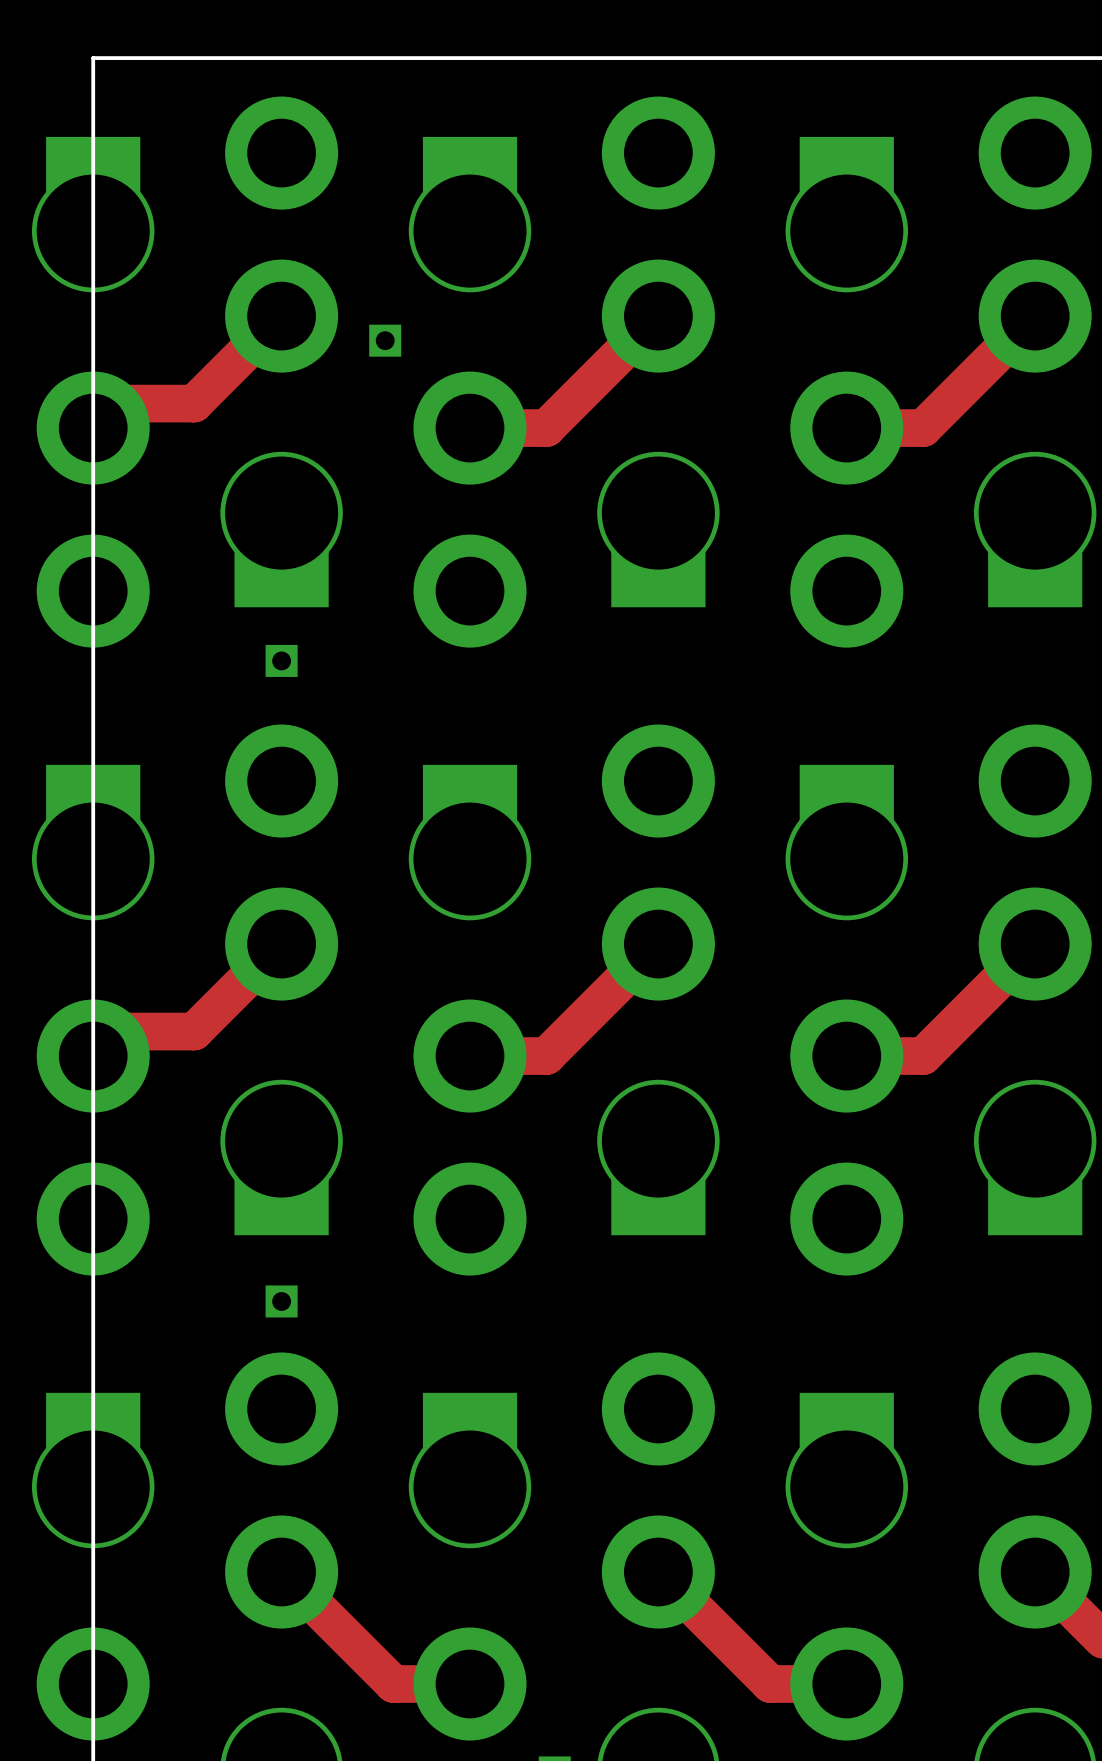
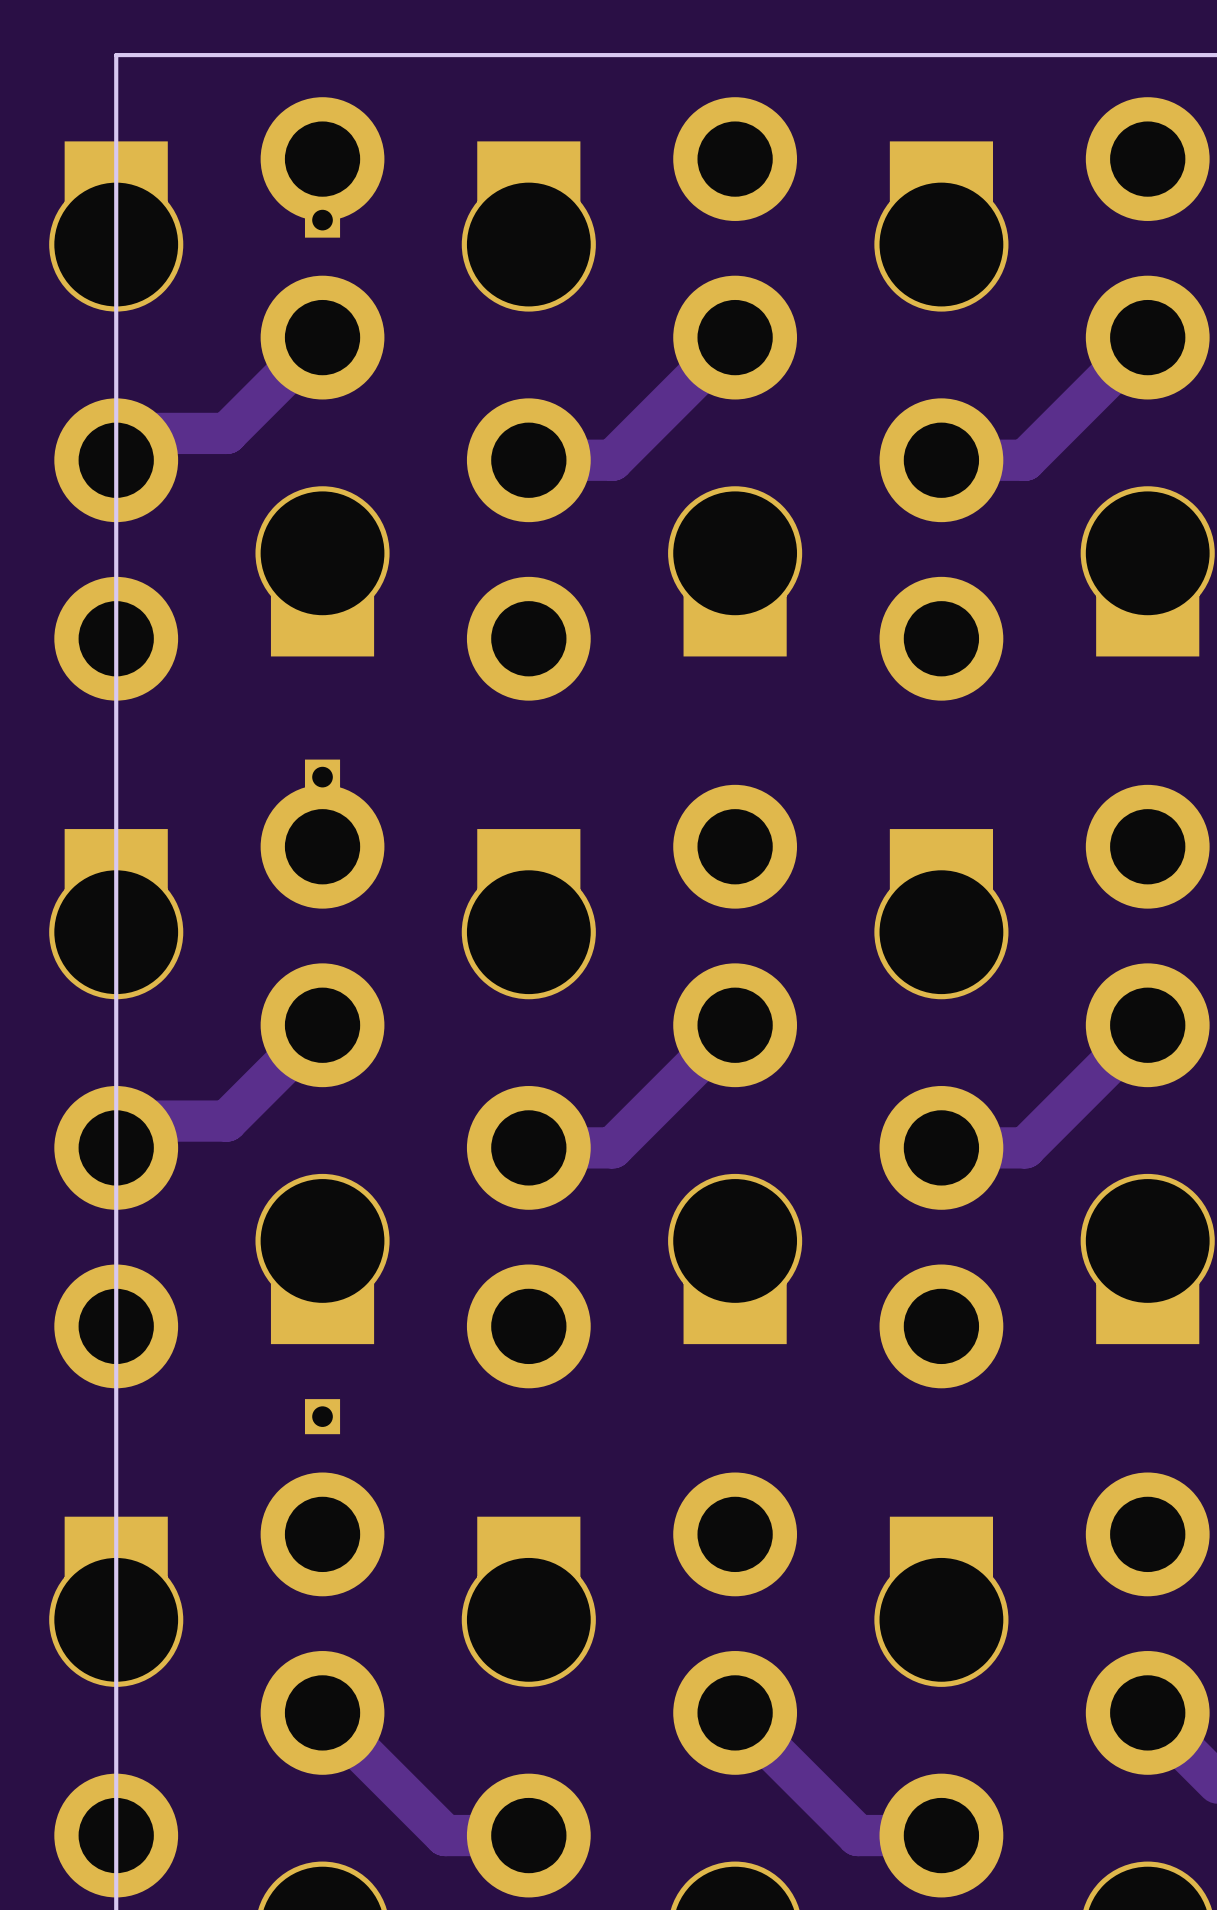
part position: (385, 340) -> (322, 220)
part position: (281, 660) -> (322, 777)

